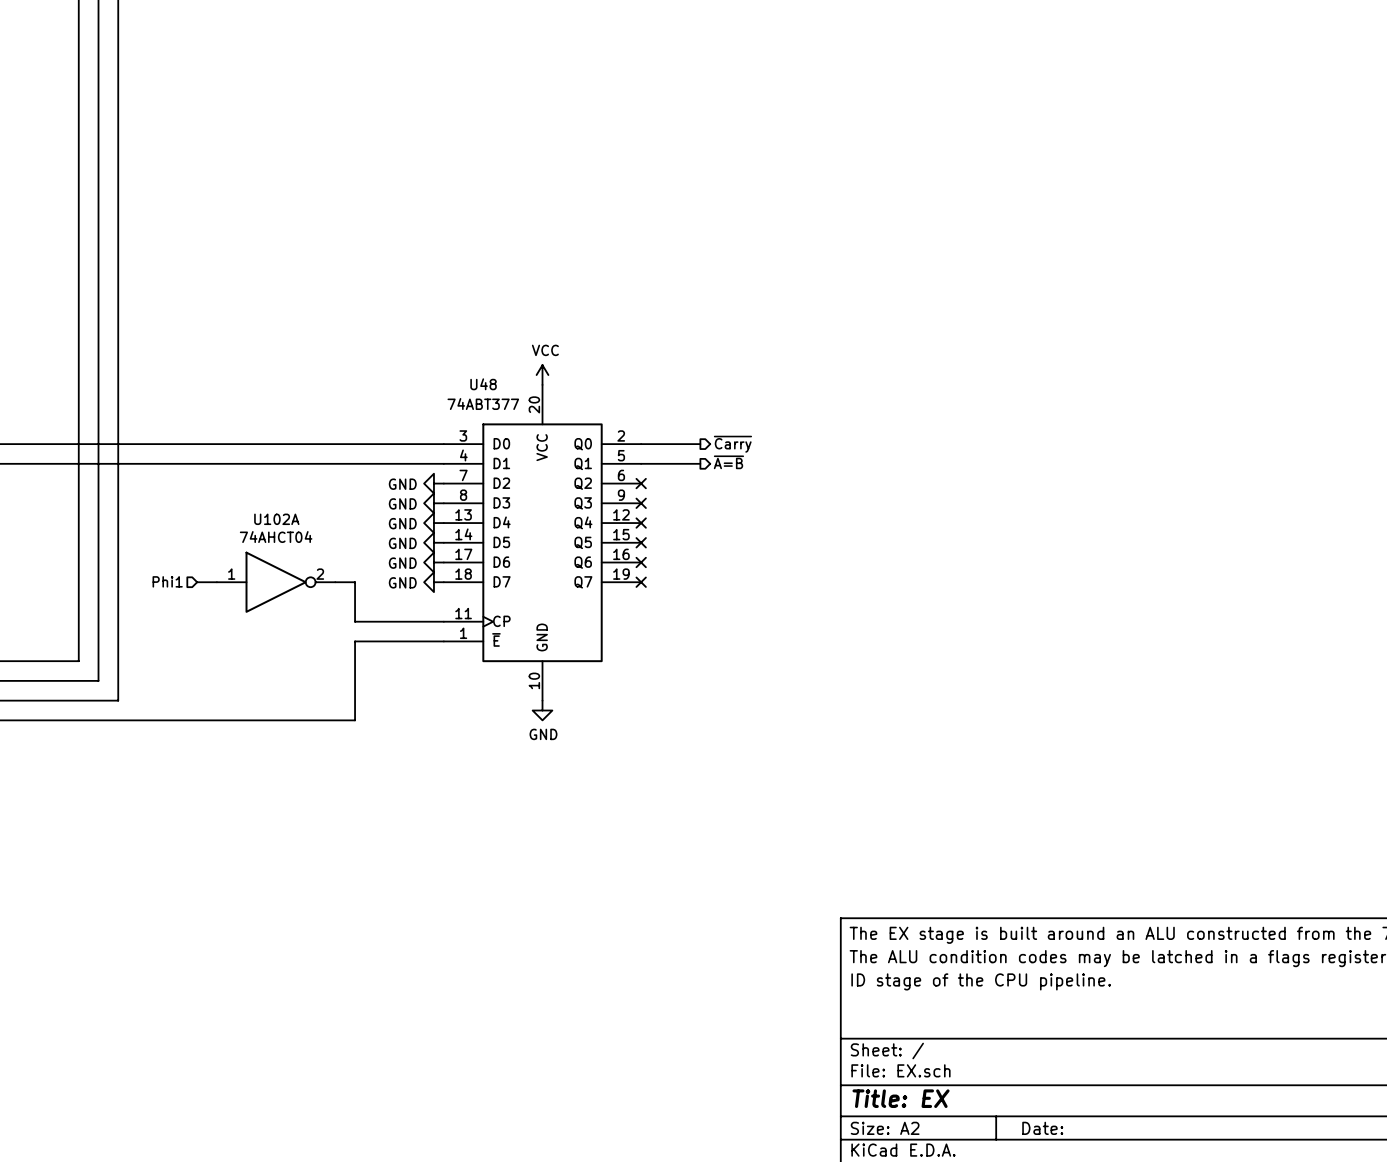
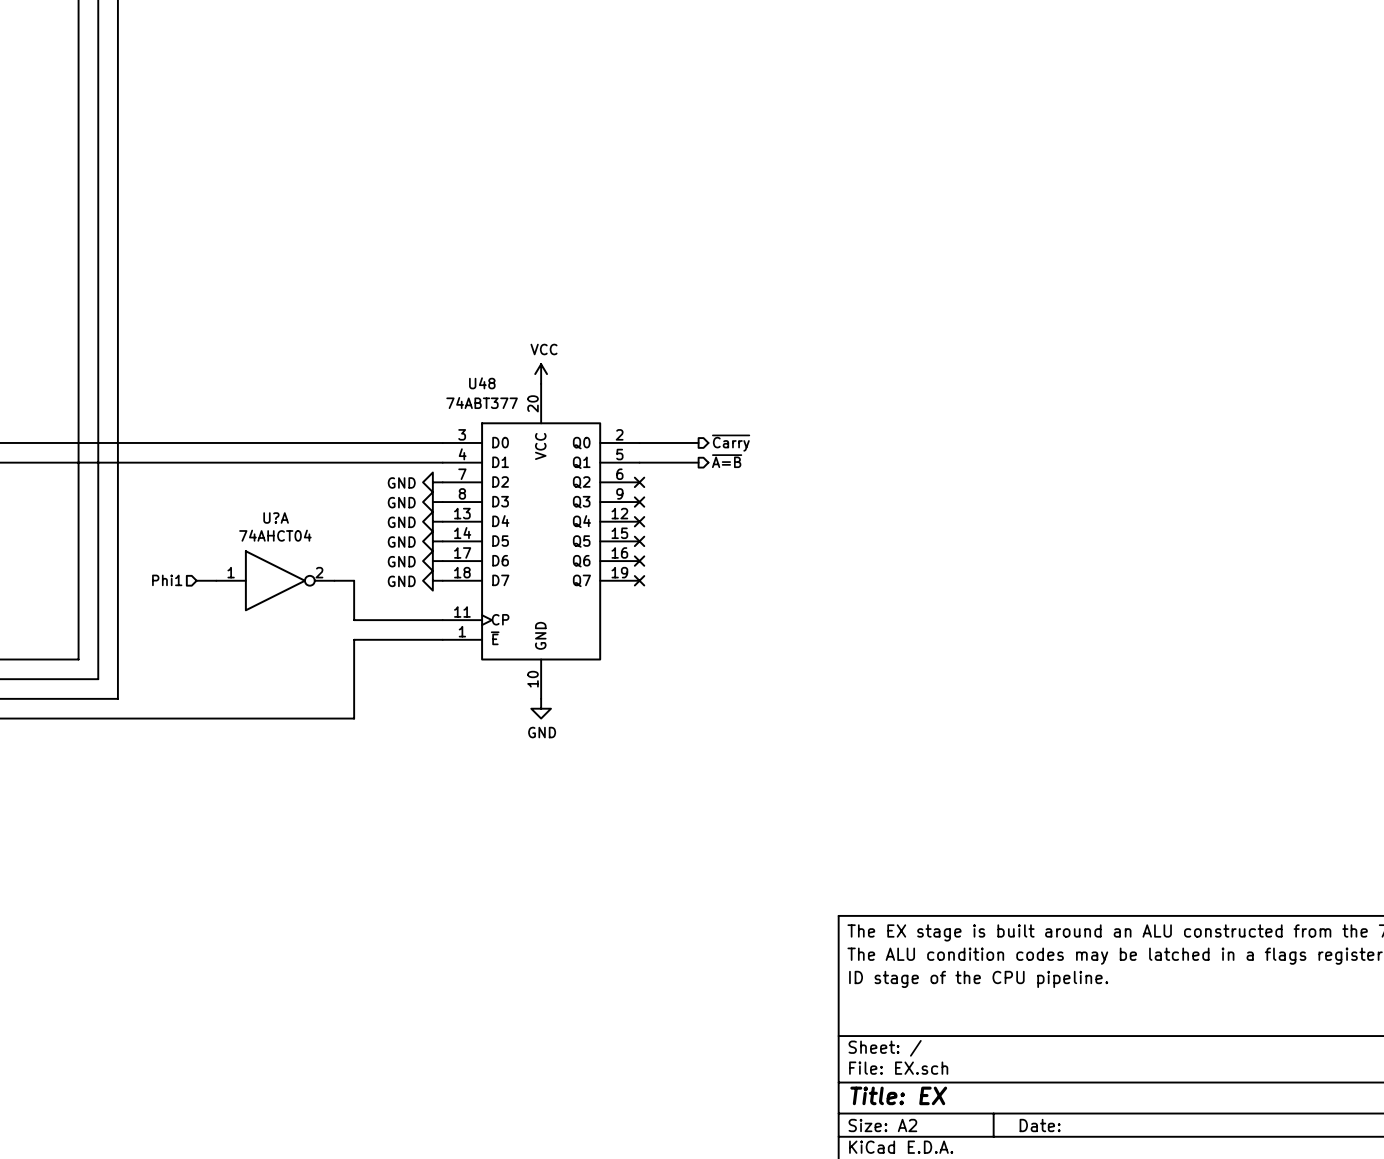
U102A name: U102A (276, 519) -> U?A (276, 518)

